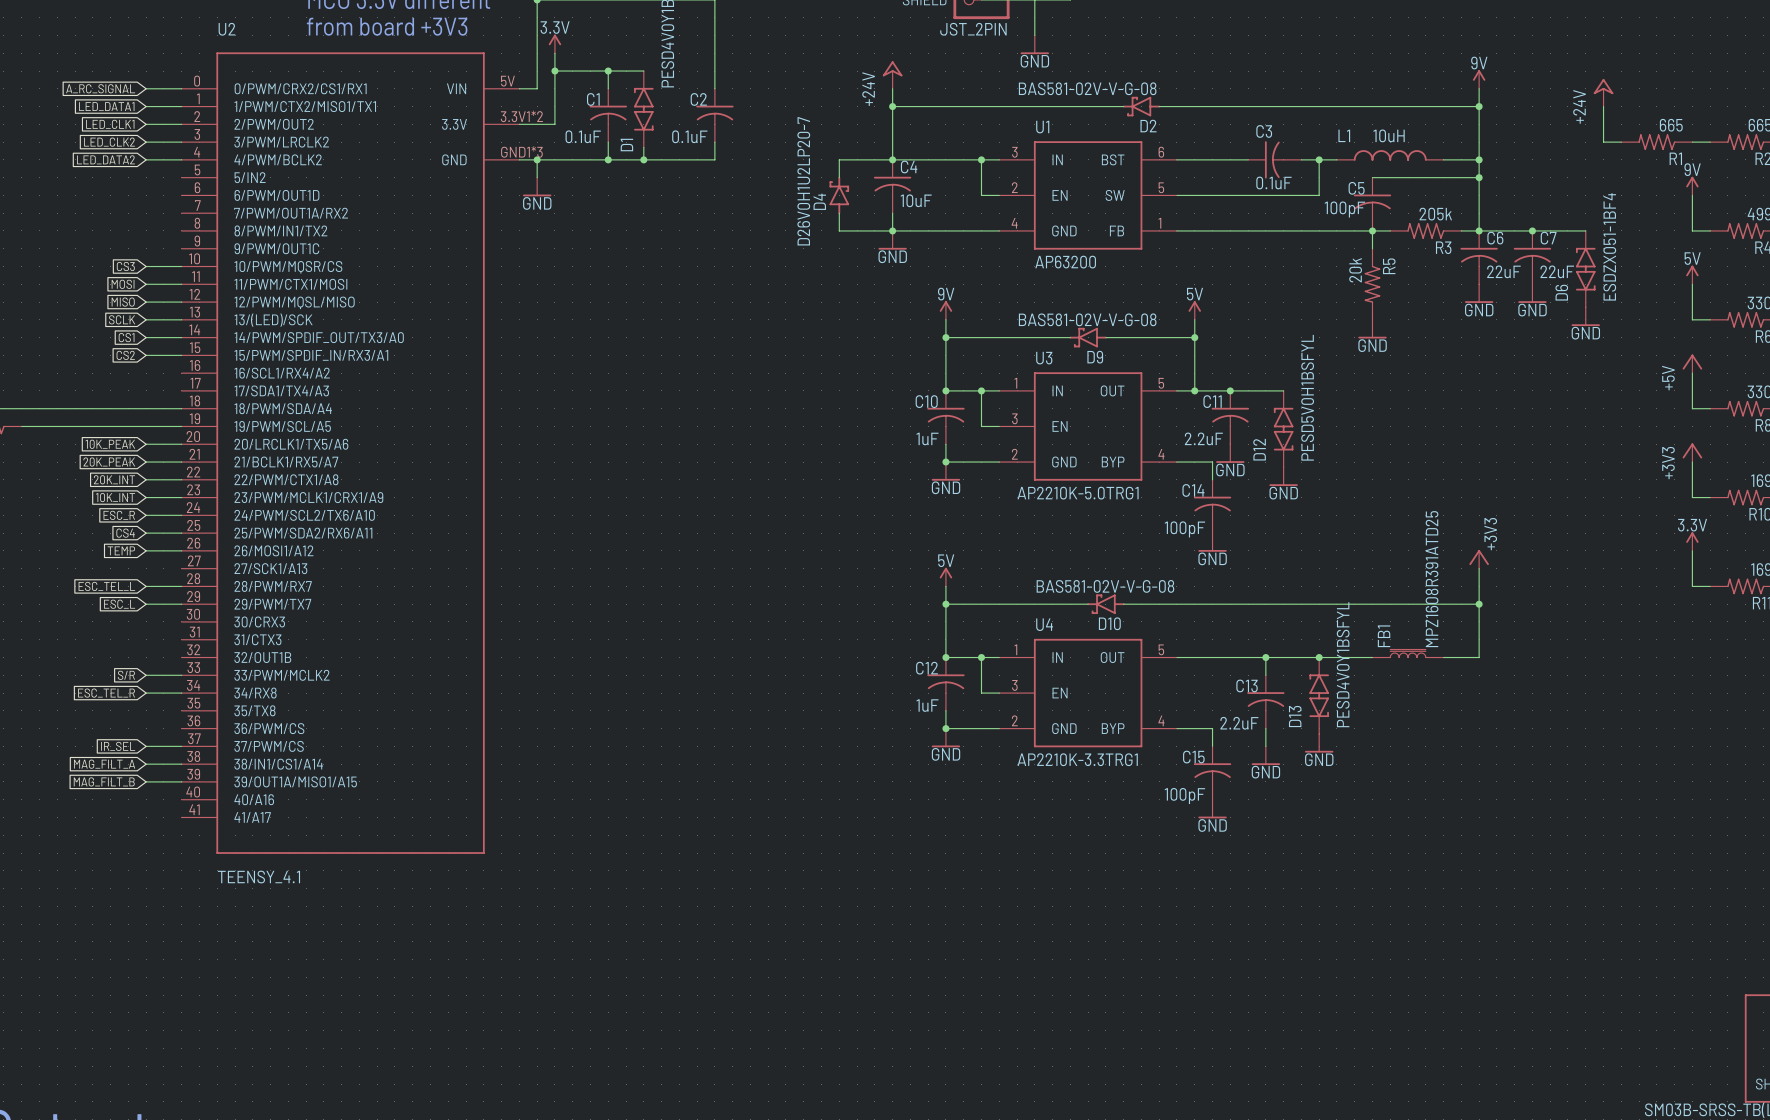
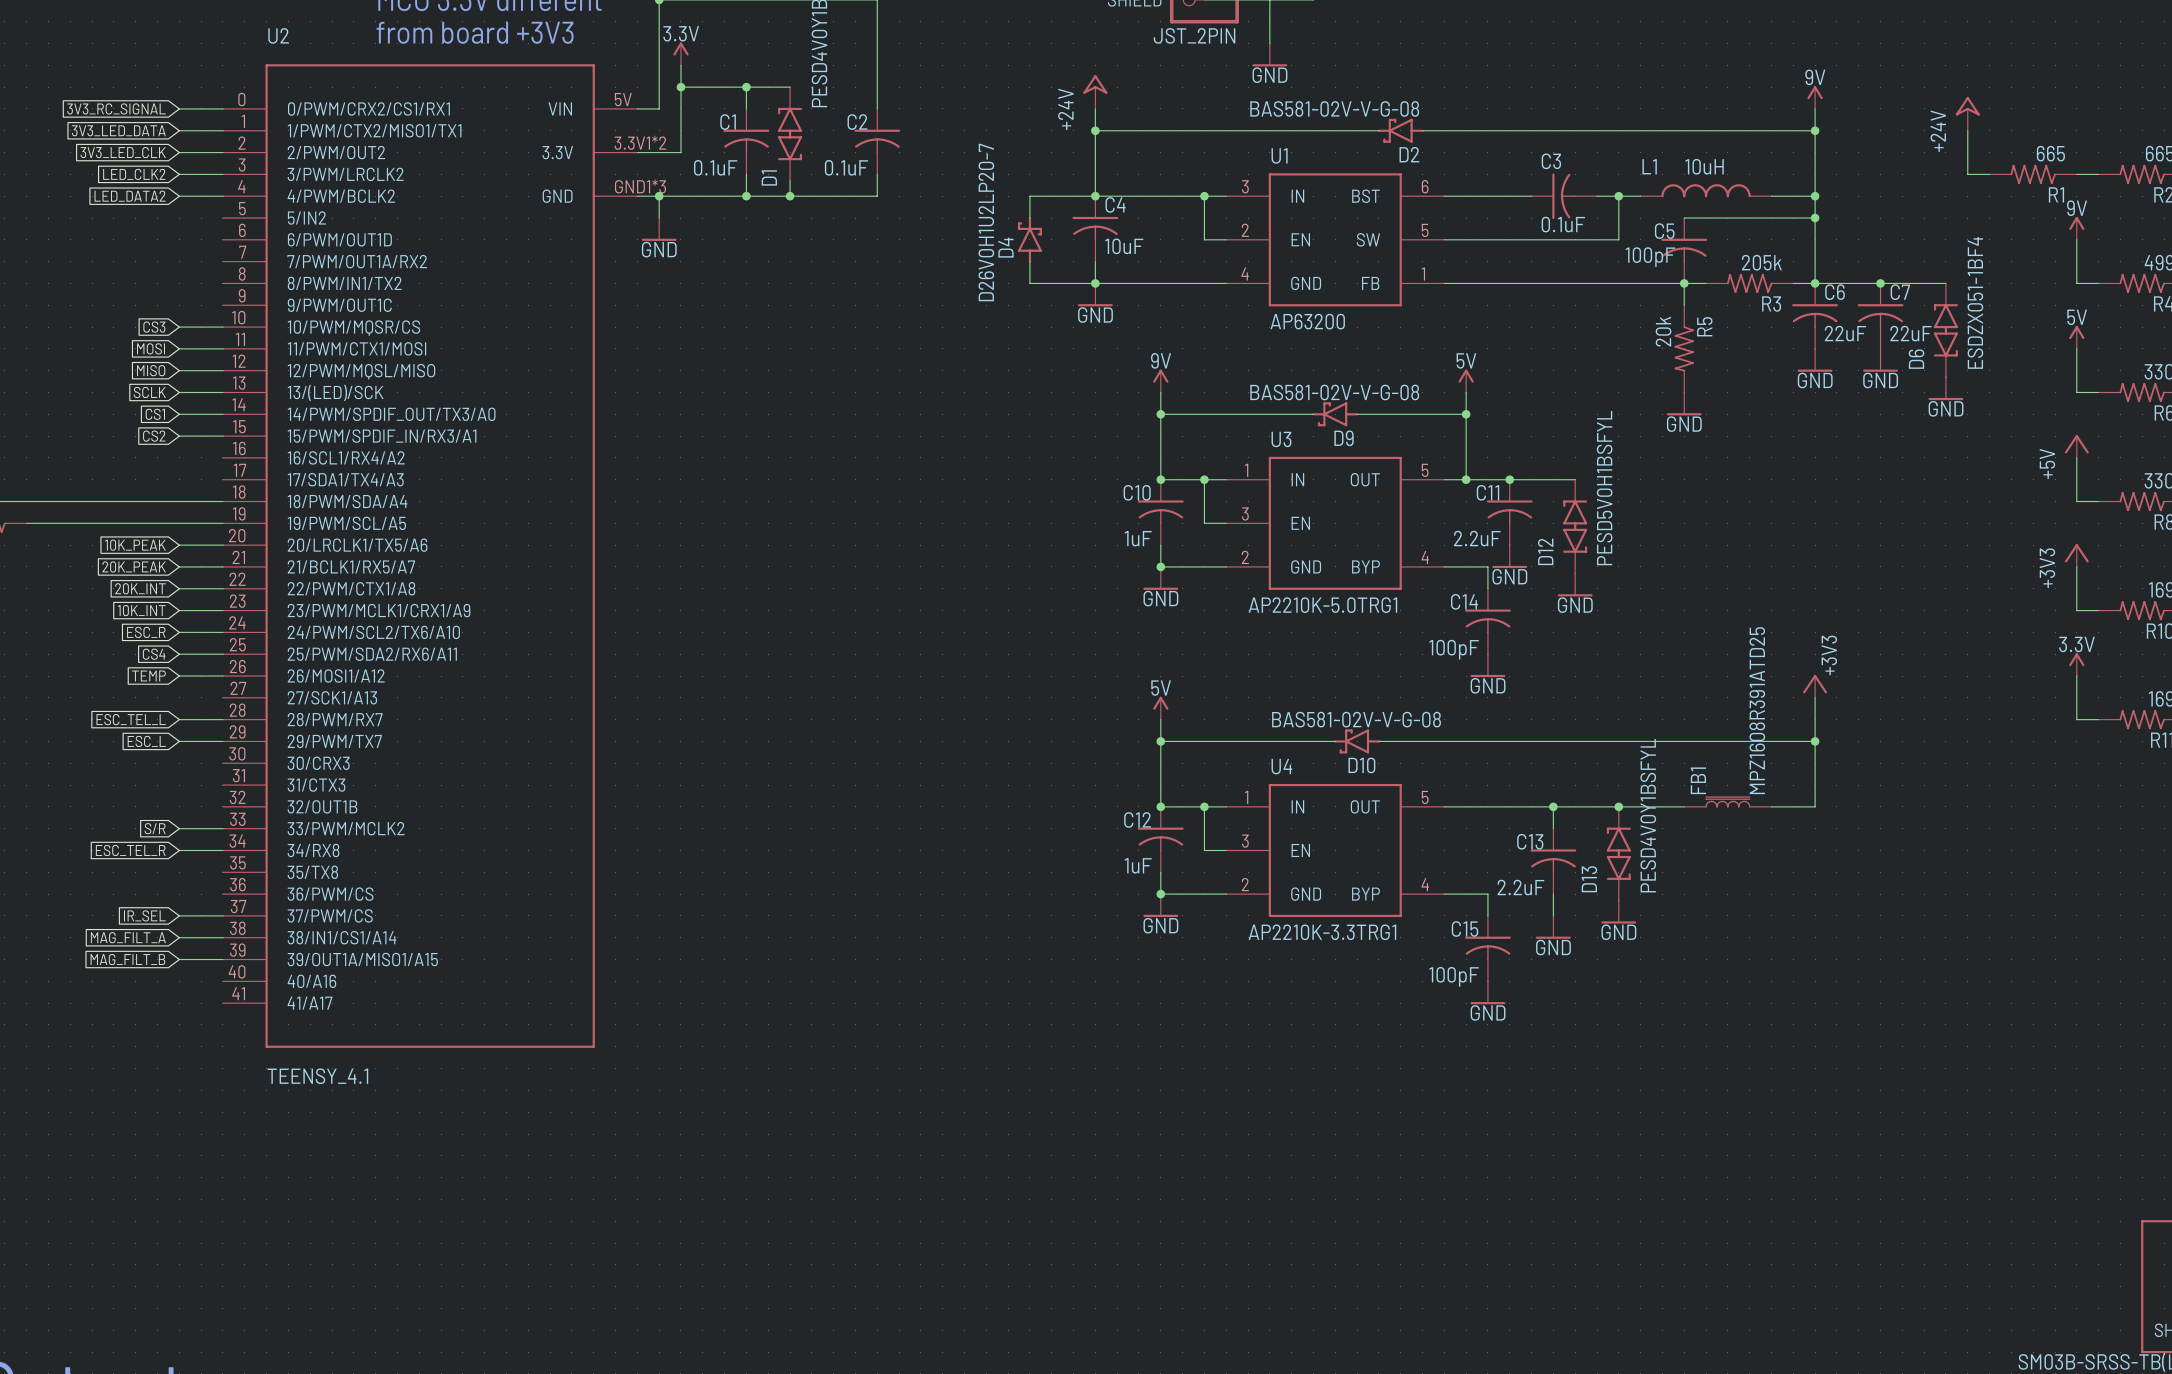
global label: A_RC_SIGNAL (100, 88) -> 3V3_RC_SIGNAL (116, 108)
global label: LED_DATA1 (106, 106) -> 3V3_LED_DATA (118, 130)
global label: LED_CLK1 (110, 124) -> 3V3_LED_CLK (123, 152)

